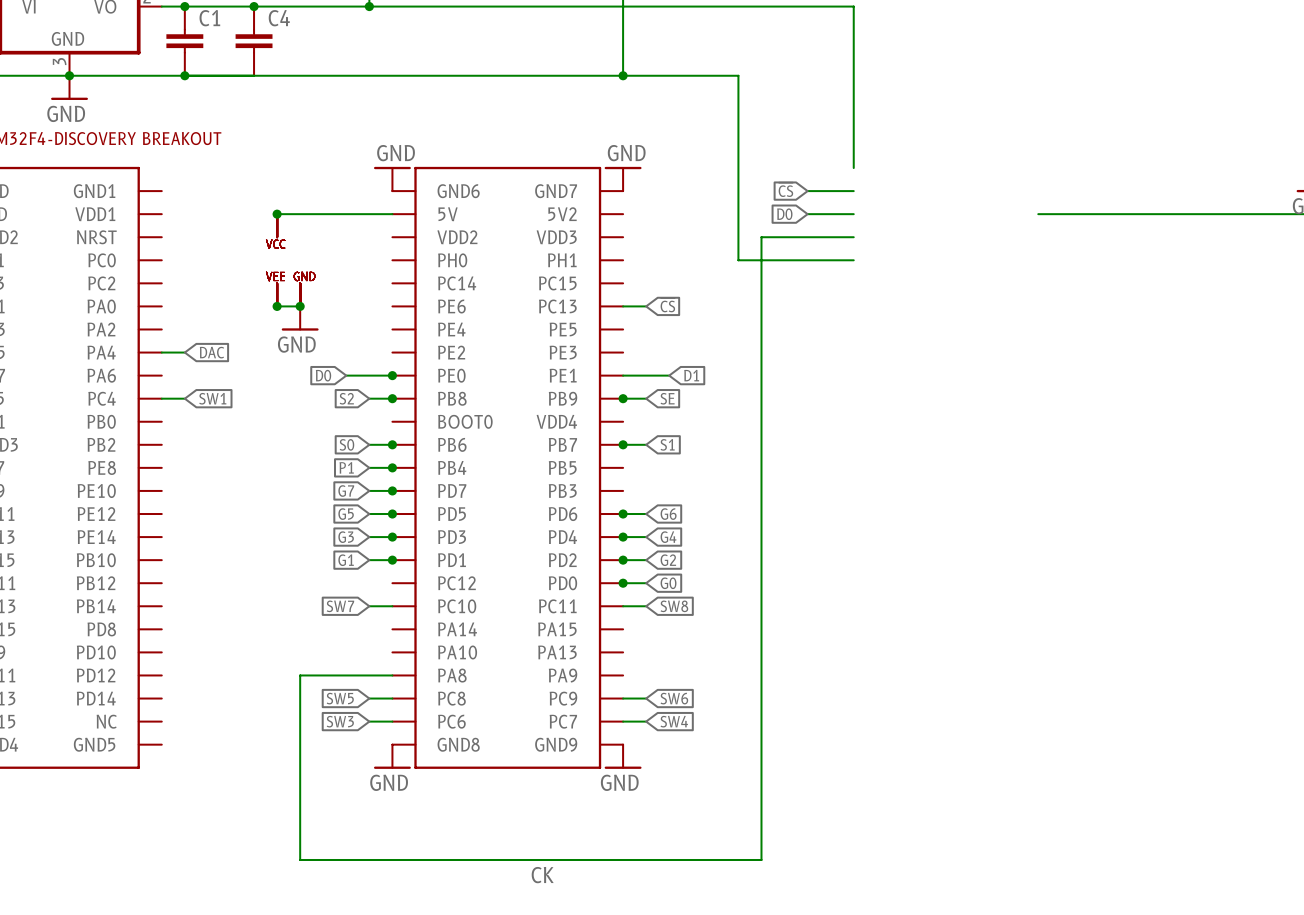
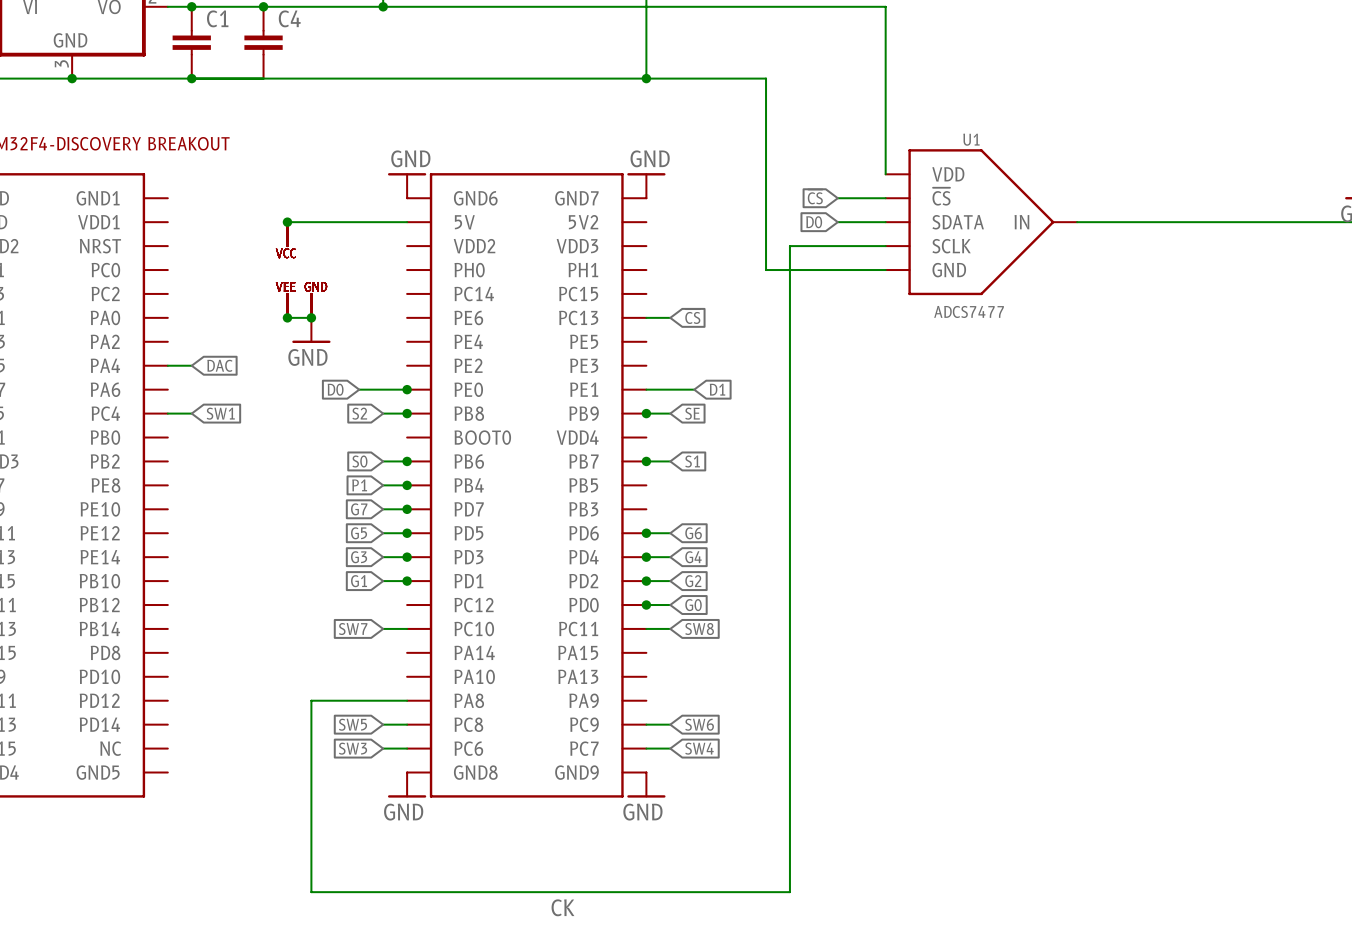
power symbol: GND (69, 87) -> none
U1: none -> ADCS7477 (981, 222)

